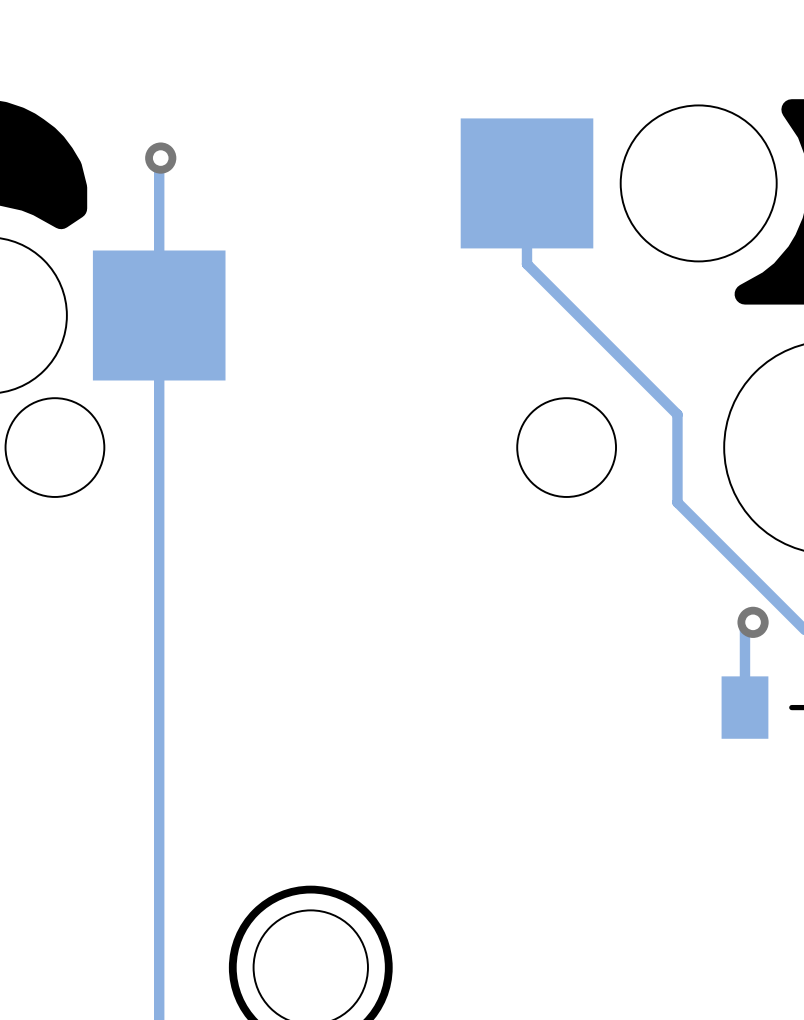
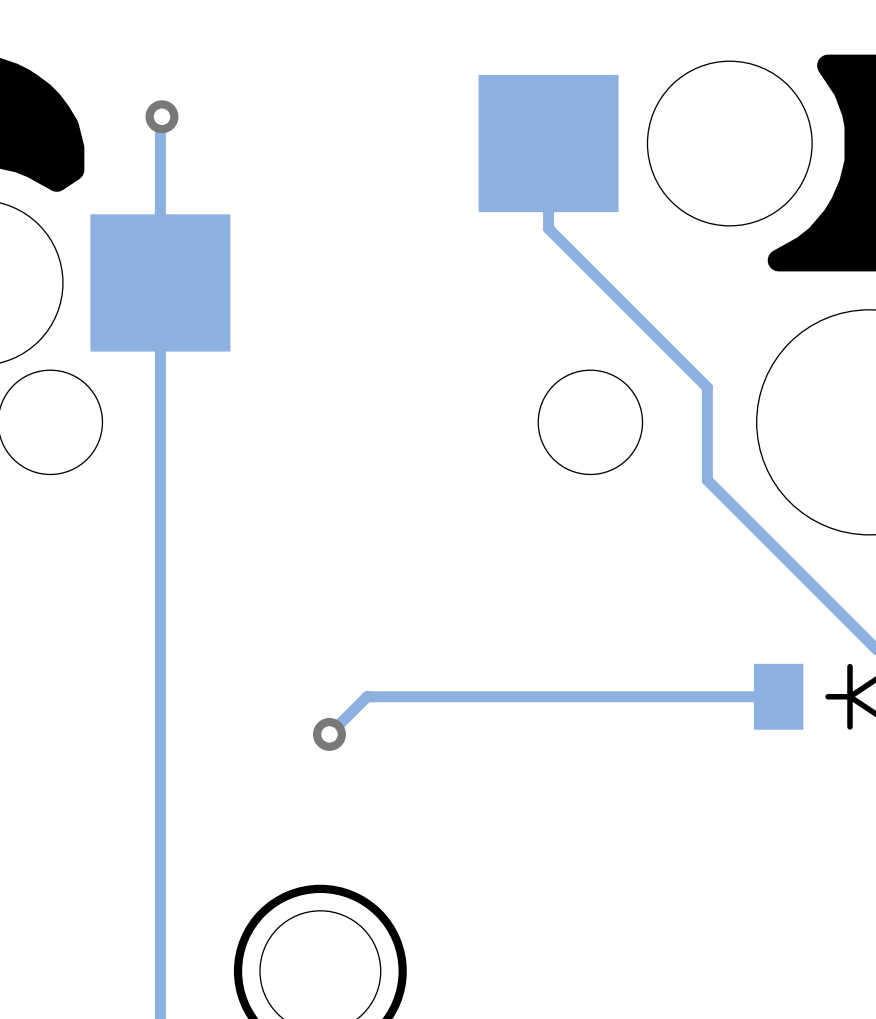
track: (753, 622) (744, 630) (744, 707) -> (329, 734) (367, 696) (778, 696)
via: (753, 622) -> none
via: none -> (329, 734)

